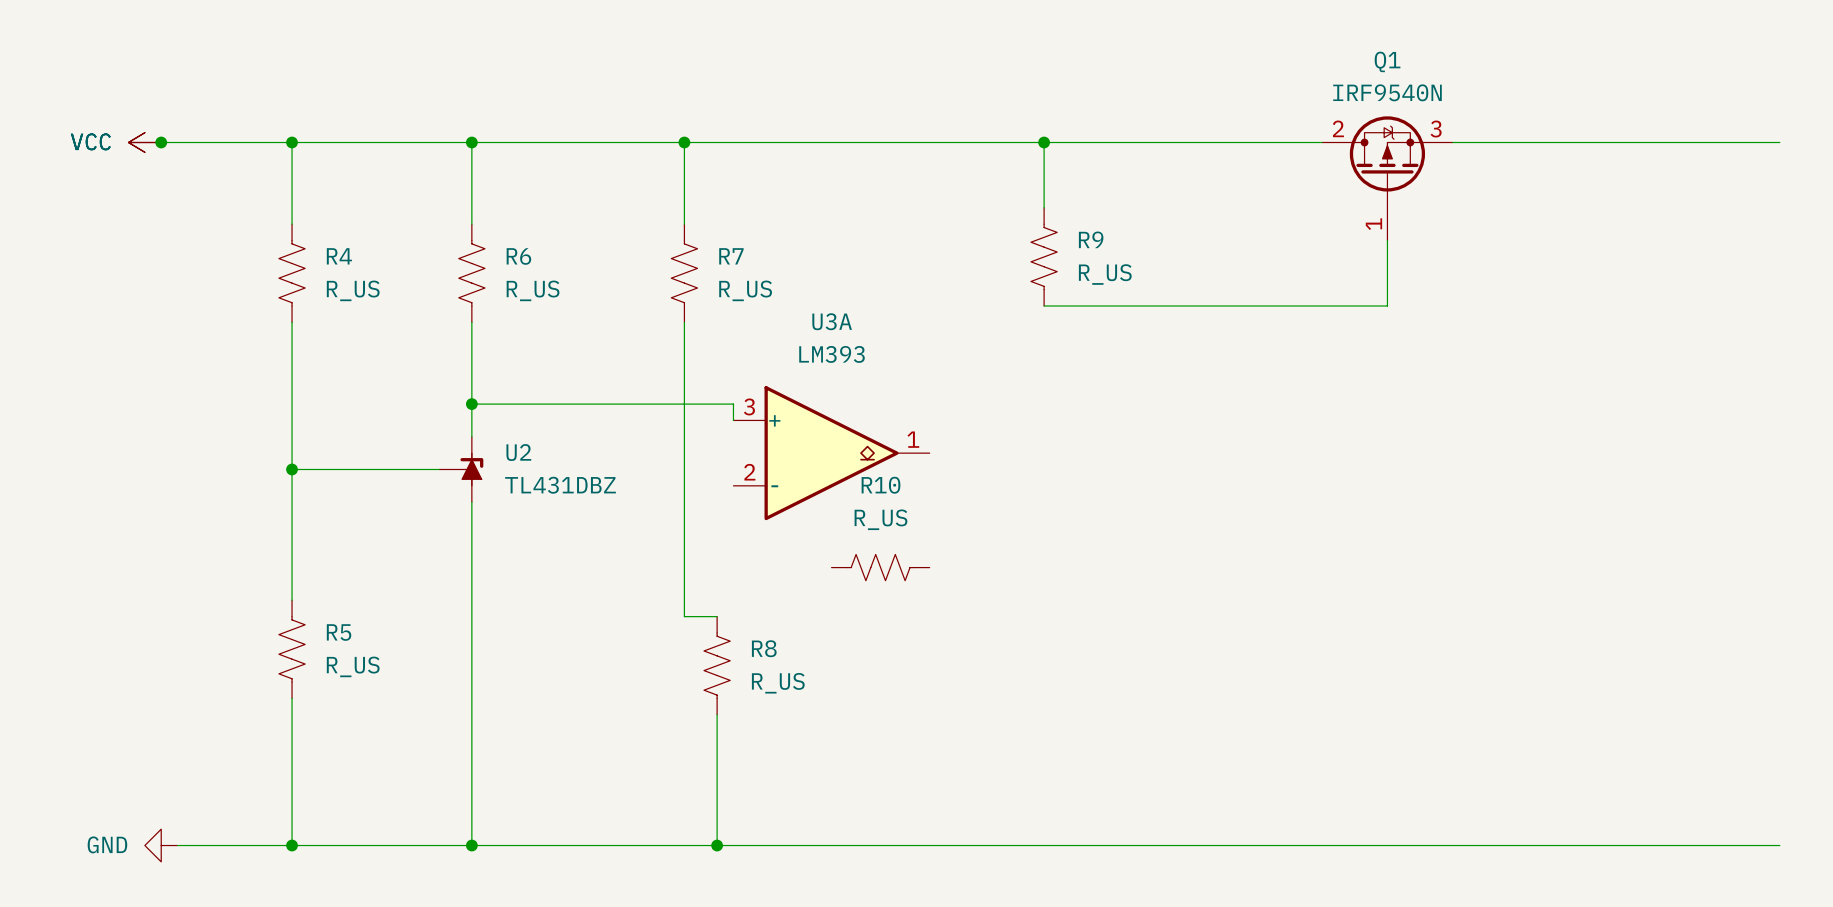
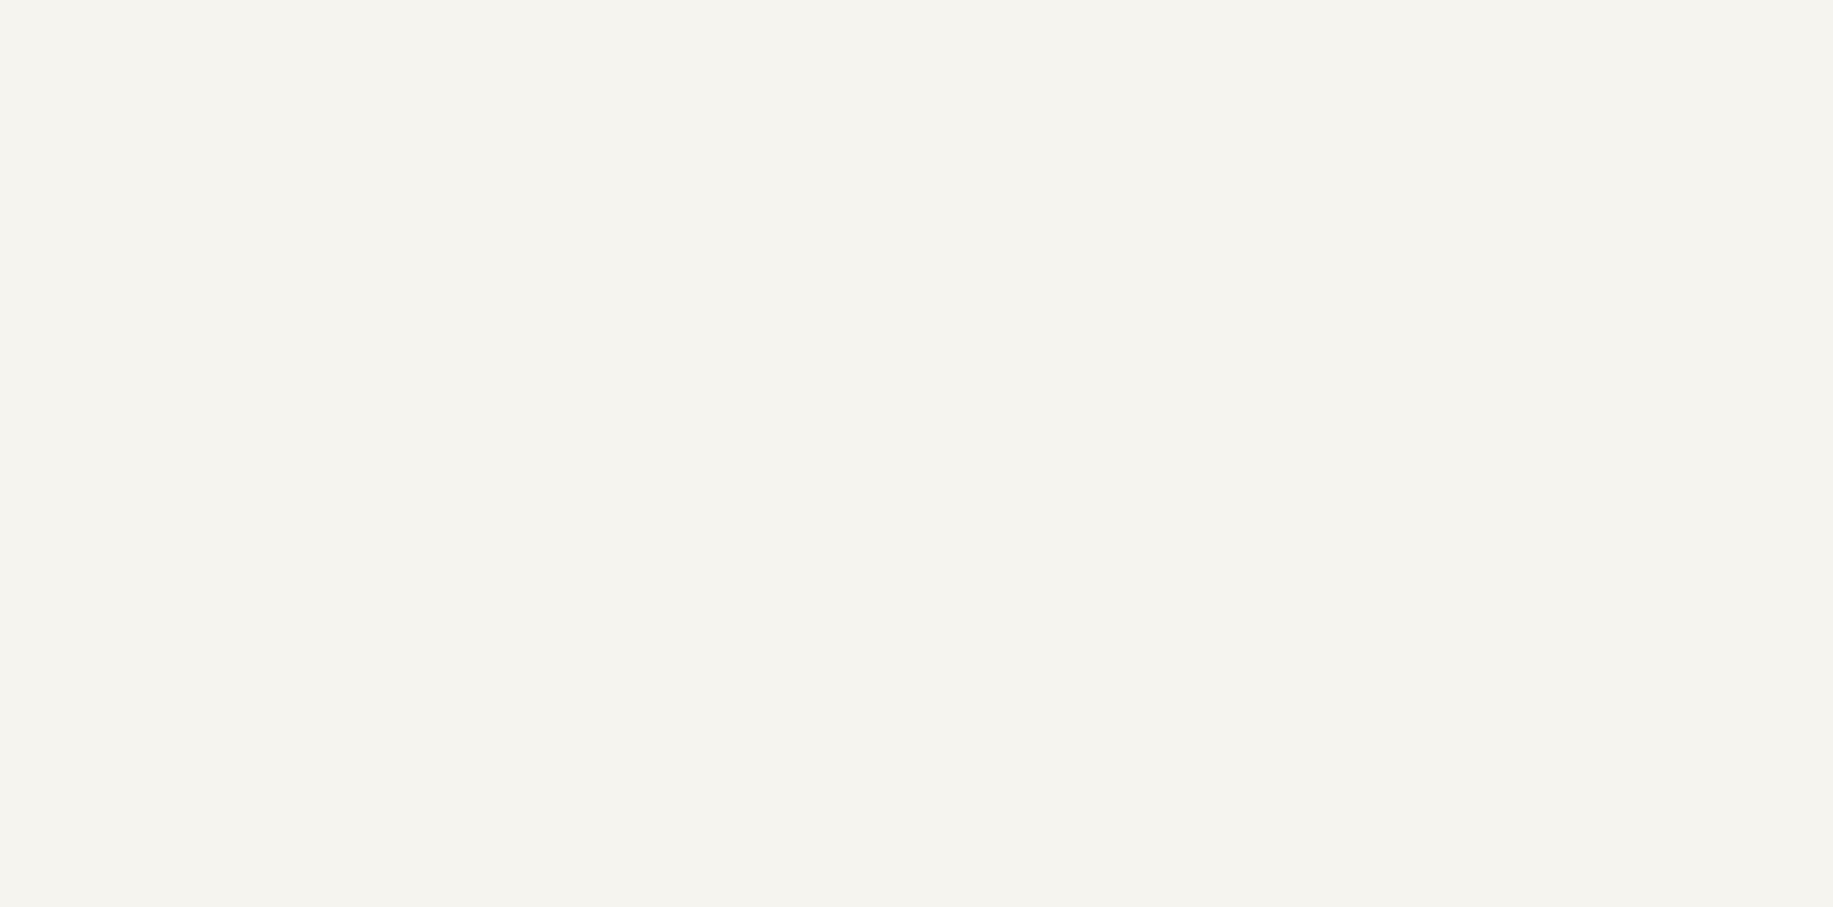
power symbol: VCC (144, 142) -> none
wire: (161, 142) (1322, 142) -> none
junction: (161, 142) -> none
wire: (292, 142) (292, 224) -> none
junction: (292, 142) -> none
wire: (471, 142) (471, 224) -> none
junction: (471, 142) -> none
wire: (684, 142) (684, 224) -> none
junction: (684, 142) -> none
wire: (1044, 142) (1044, 207) -> none
junction: (1044, 142) -> none
wire: (1452, 142) (1779, 142) -> none
Q1: IRF9540N (1387, 178) -> none
wire: (1387, 240) (1387, 305) (1044, 305) -> none
R9: R_US (1044, 256) -> none
R4: R_US (292, 273) -> none
R6: R_US (471, 273) -> none
R7: R_US (684, 273) -> none
wire: (292, 322) (292, 600) -> none
wire: (471, 322) (471, 436) -> none
wire: (684, 322) (684, 616) (717, 616) -> none
wire: (471, 404) (733, 404) (733, 420) -> none
junction: (471, 404) -> none
U3A: LM393 (831, 453) -> none
wire: (292, 469) (439, 469) -> none
junction: (292, 469) -> none
U2: TL431DBZ (461, 469) -> none
wire: (471, 502) (471, 845) -> none
R10: R_US (880, 567) -> none
R5: R_US (292, 649) -> none
R8: R_US (717, 665) -> none
wire: (292, 698) (292, 845) -> none
wire: (717, 714) (717, 845) -> none
power symbol: GND (161, 845) -> none
wire: (177, 845) (1779, 845) -> none
junction: (292, 845) -> none
junction: (471, 845) -> none
junction: (717, 845) -> none

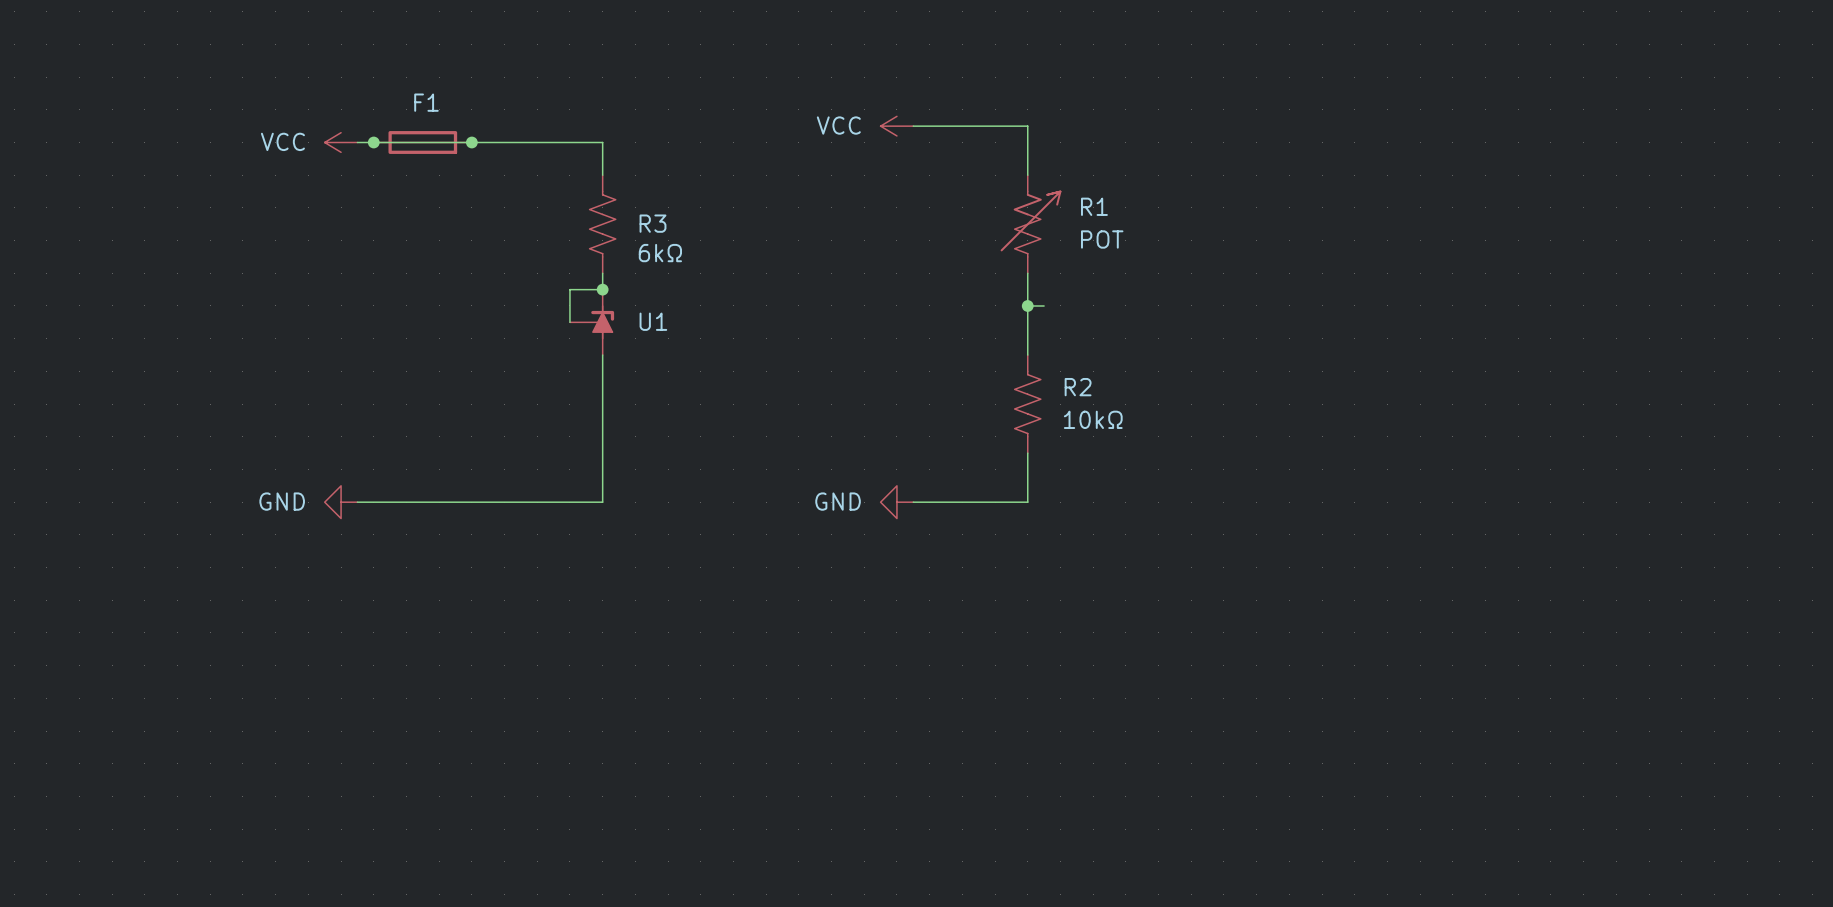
power symbol: none -> VCC (896, 126)
wire: none -> (913, 126) (1027, 126) (1027, 175)
power symbol: none -> VCC (341, 142)
wire: none -> (357, 142) (602, 142) (602, 175)
junction: none -> (373, 142)
F1: none -> (422, 142)
junction: none -> (471, 142)
R3: none -> 6kΩ (602, 224)
R1: none -> POT (1031, 224)
wire: none -> (602, 273) (602, 289) (569, 289) (569, 322)
wire: none -> (1027, 273) (1027, 355)
junction: none -> (602, 289)
wire: none -> (1027, 305) (1044, 305)
junction: none -> (1027, 305)
U1: none -> (592, 322)
wire: none -> (602, 355) (602, 502) (357, 502)
R2: none -> 10kΩ (1027, 404)
wire: none -> (1027, 453) (1027, 502) (913, 502)
power symbol: none -> GND (341, 502)
power symbol: none -> GND (896, 502)

